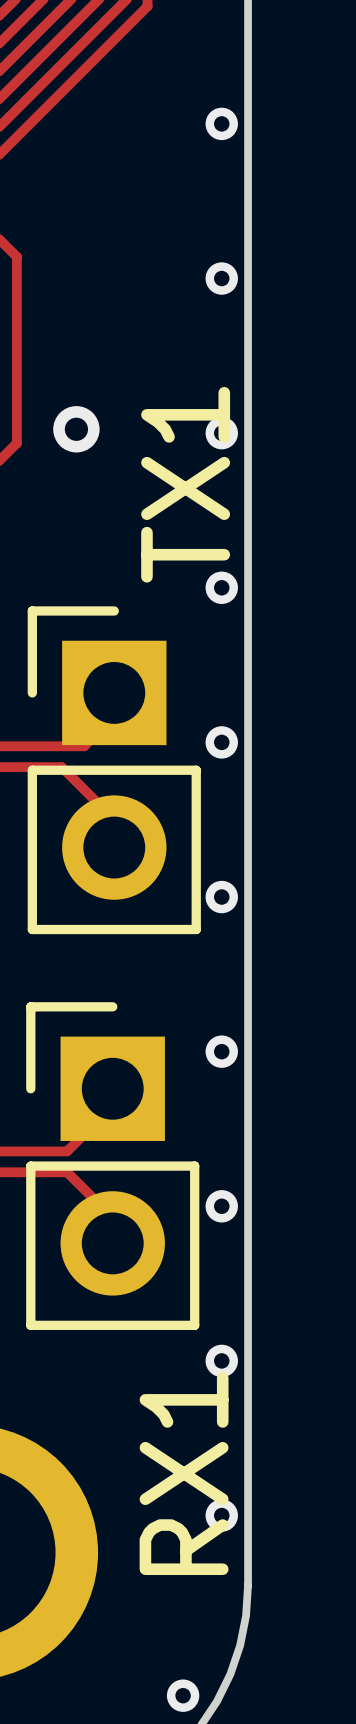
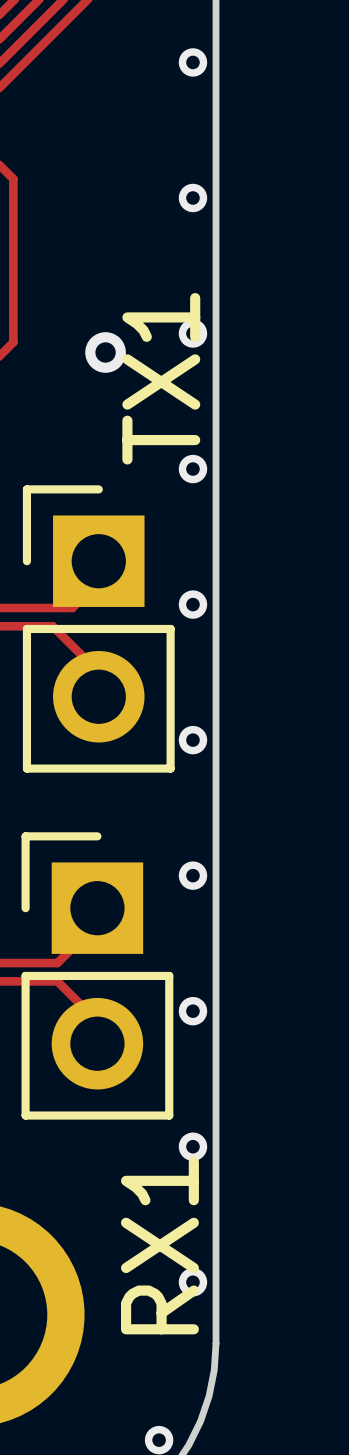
via position: (76, 429) -> (105, 352)

